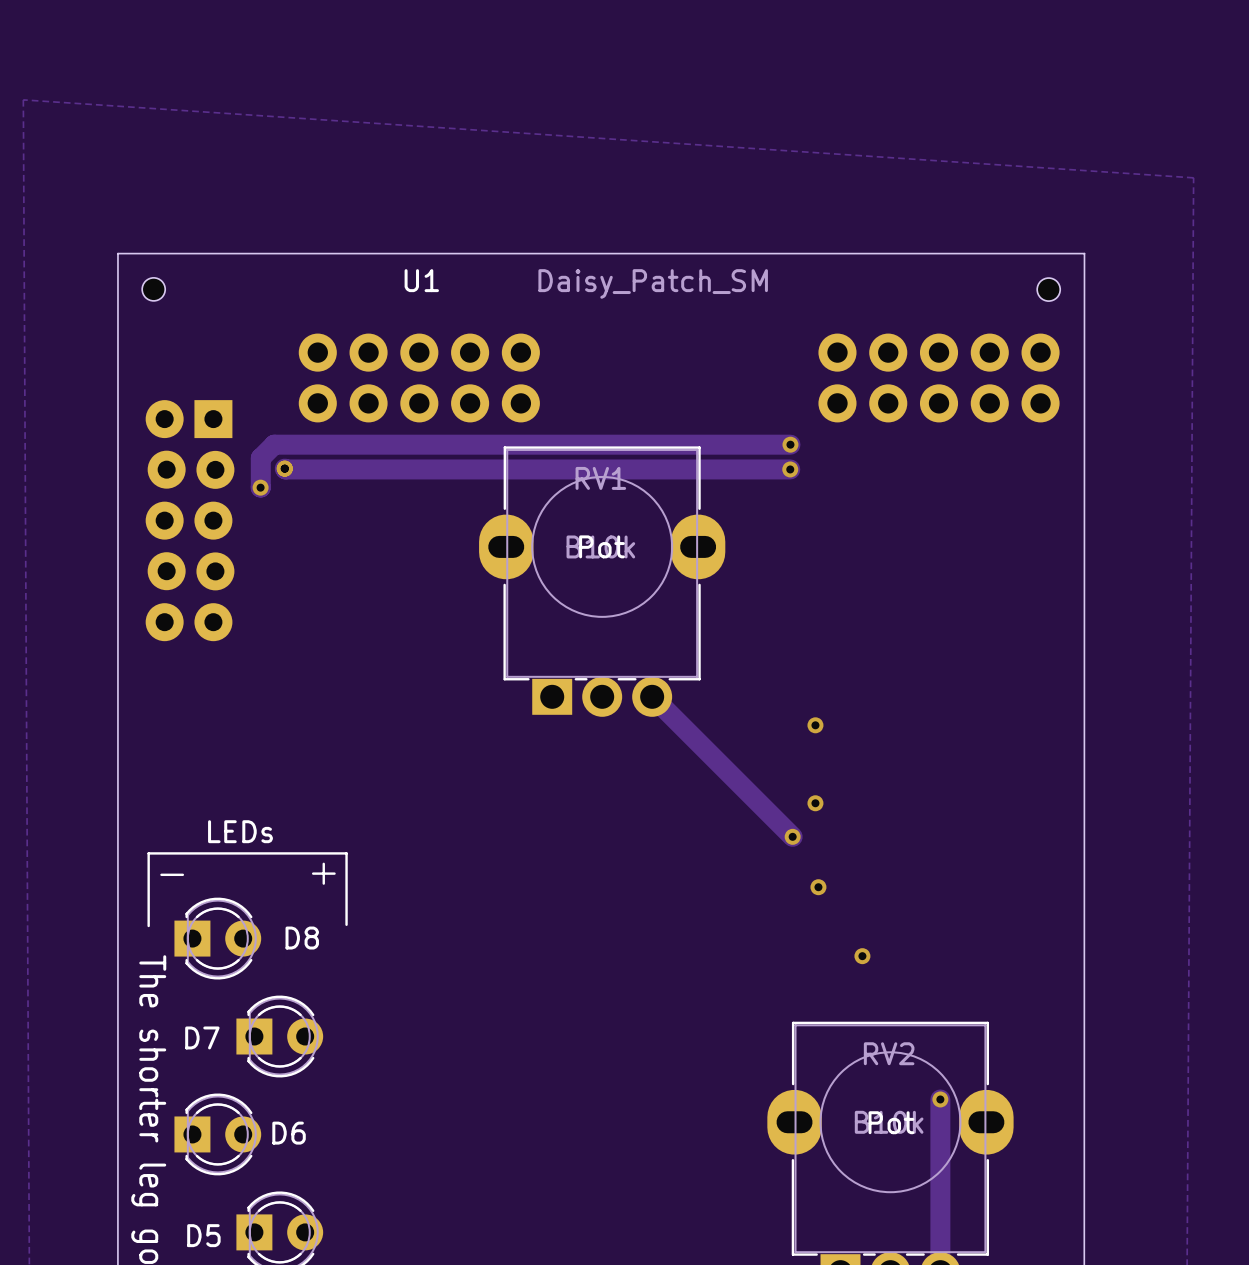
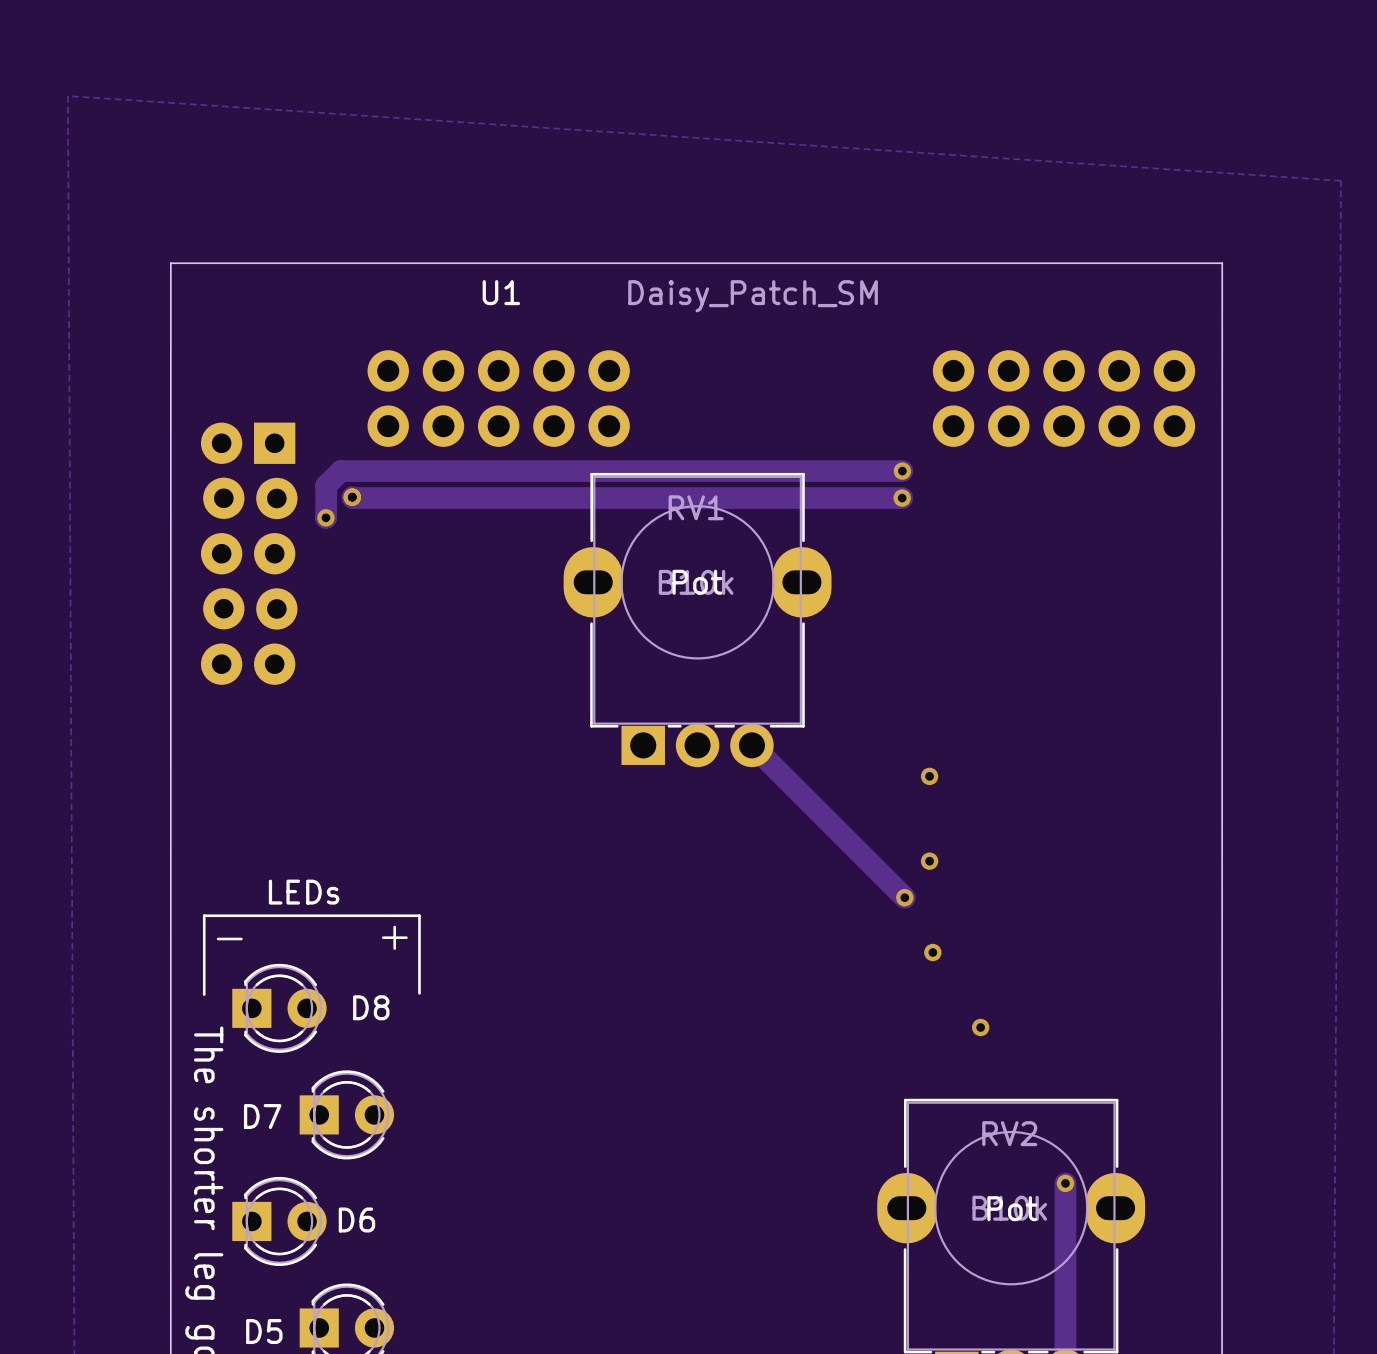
part: (153, 289) -> none
part: (1048, 289) -> none

